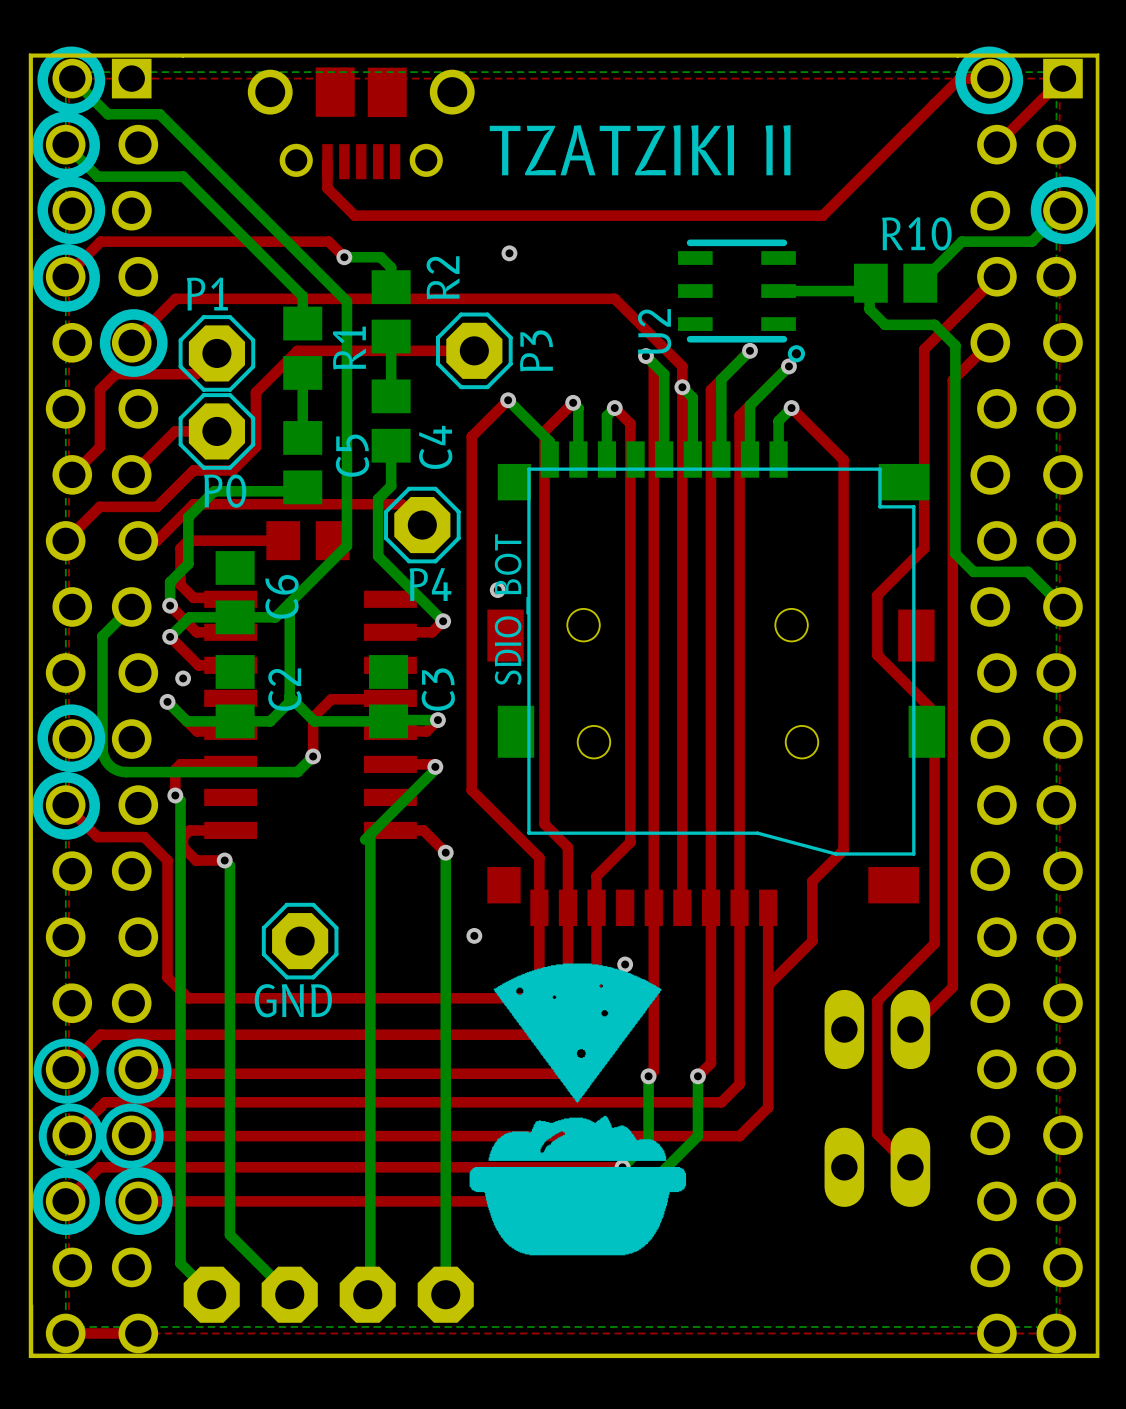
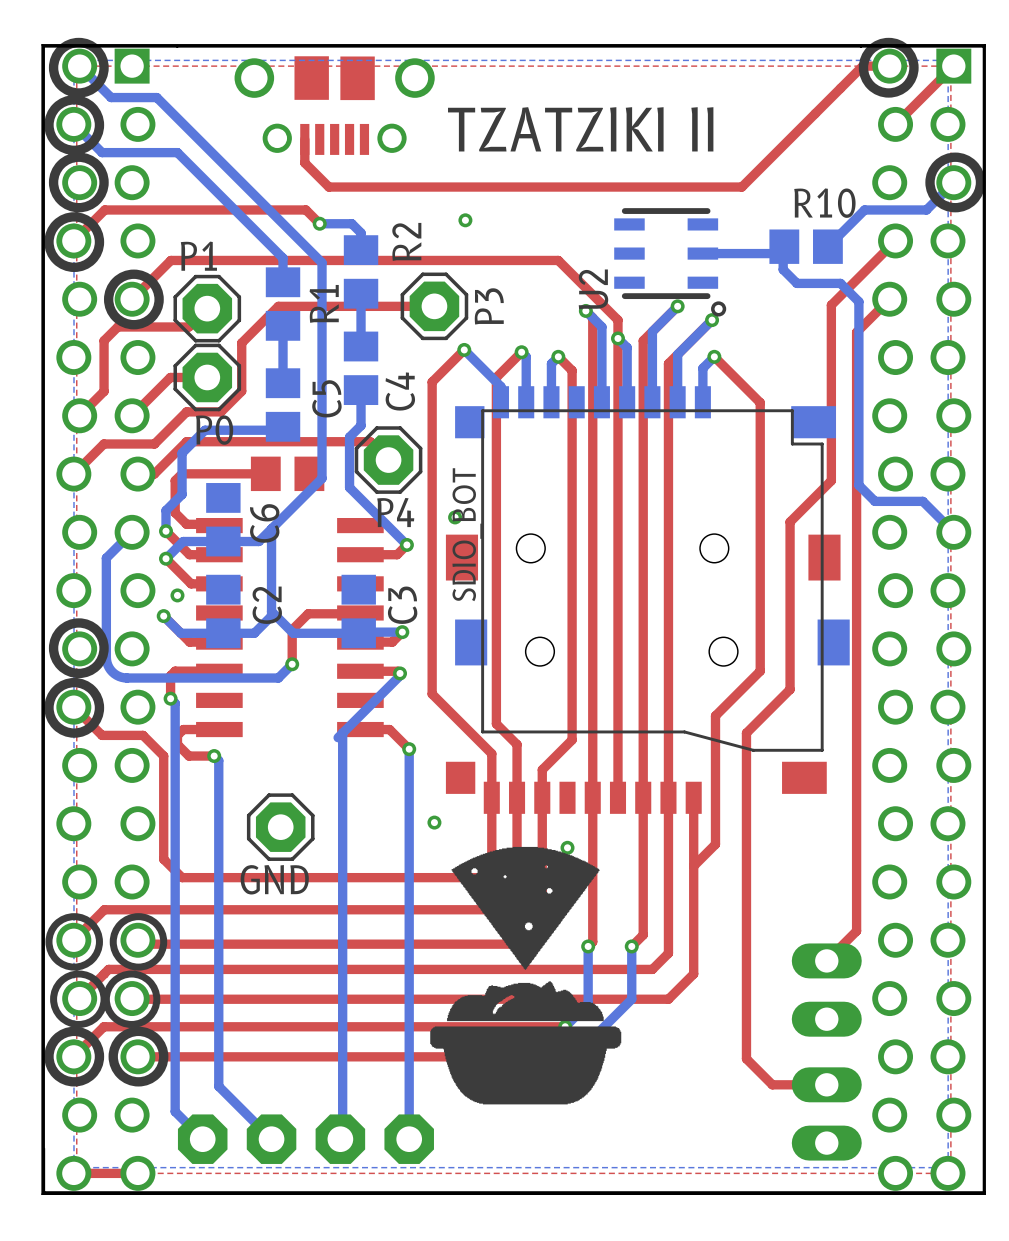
top track: (877, 655) (934, 712) (934, 943) (877, 1000) (877, 1134) (910, 1167) -> (790, 574) (790, 689) (746, 733) (746, 1058) (772, 1084) (826, 1084)
top track: (843, 764) (843, 850) (812, 881) (812, 941) (792, 960) -> (760, 671) (715, 715) (715, 844)
top track: (952, 987) (910, 1029) -> (856, 867) (856, 931) (826, 960)
part: (877, 1029) -> none
part: none -> (826, 990)
part: (877, 1167) -> none
part: none -> (826, 1113)

